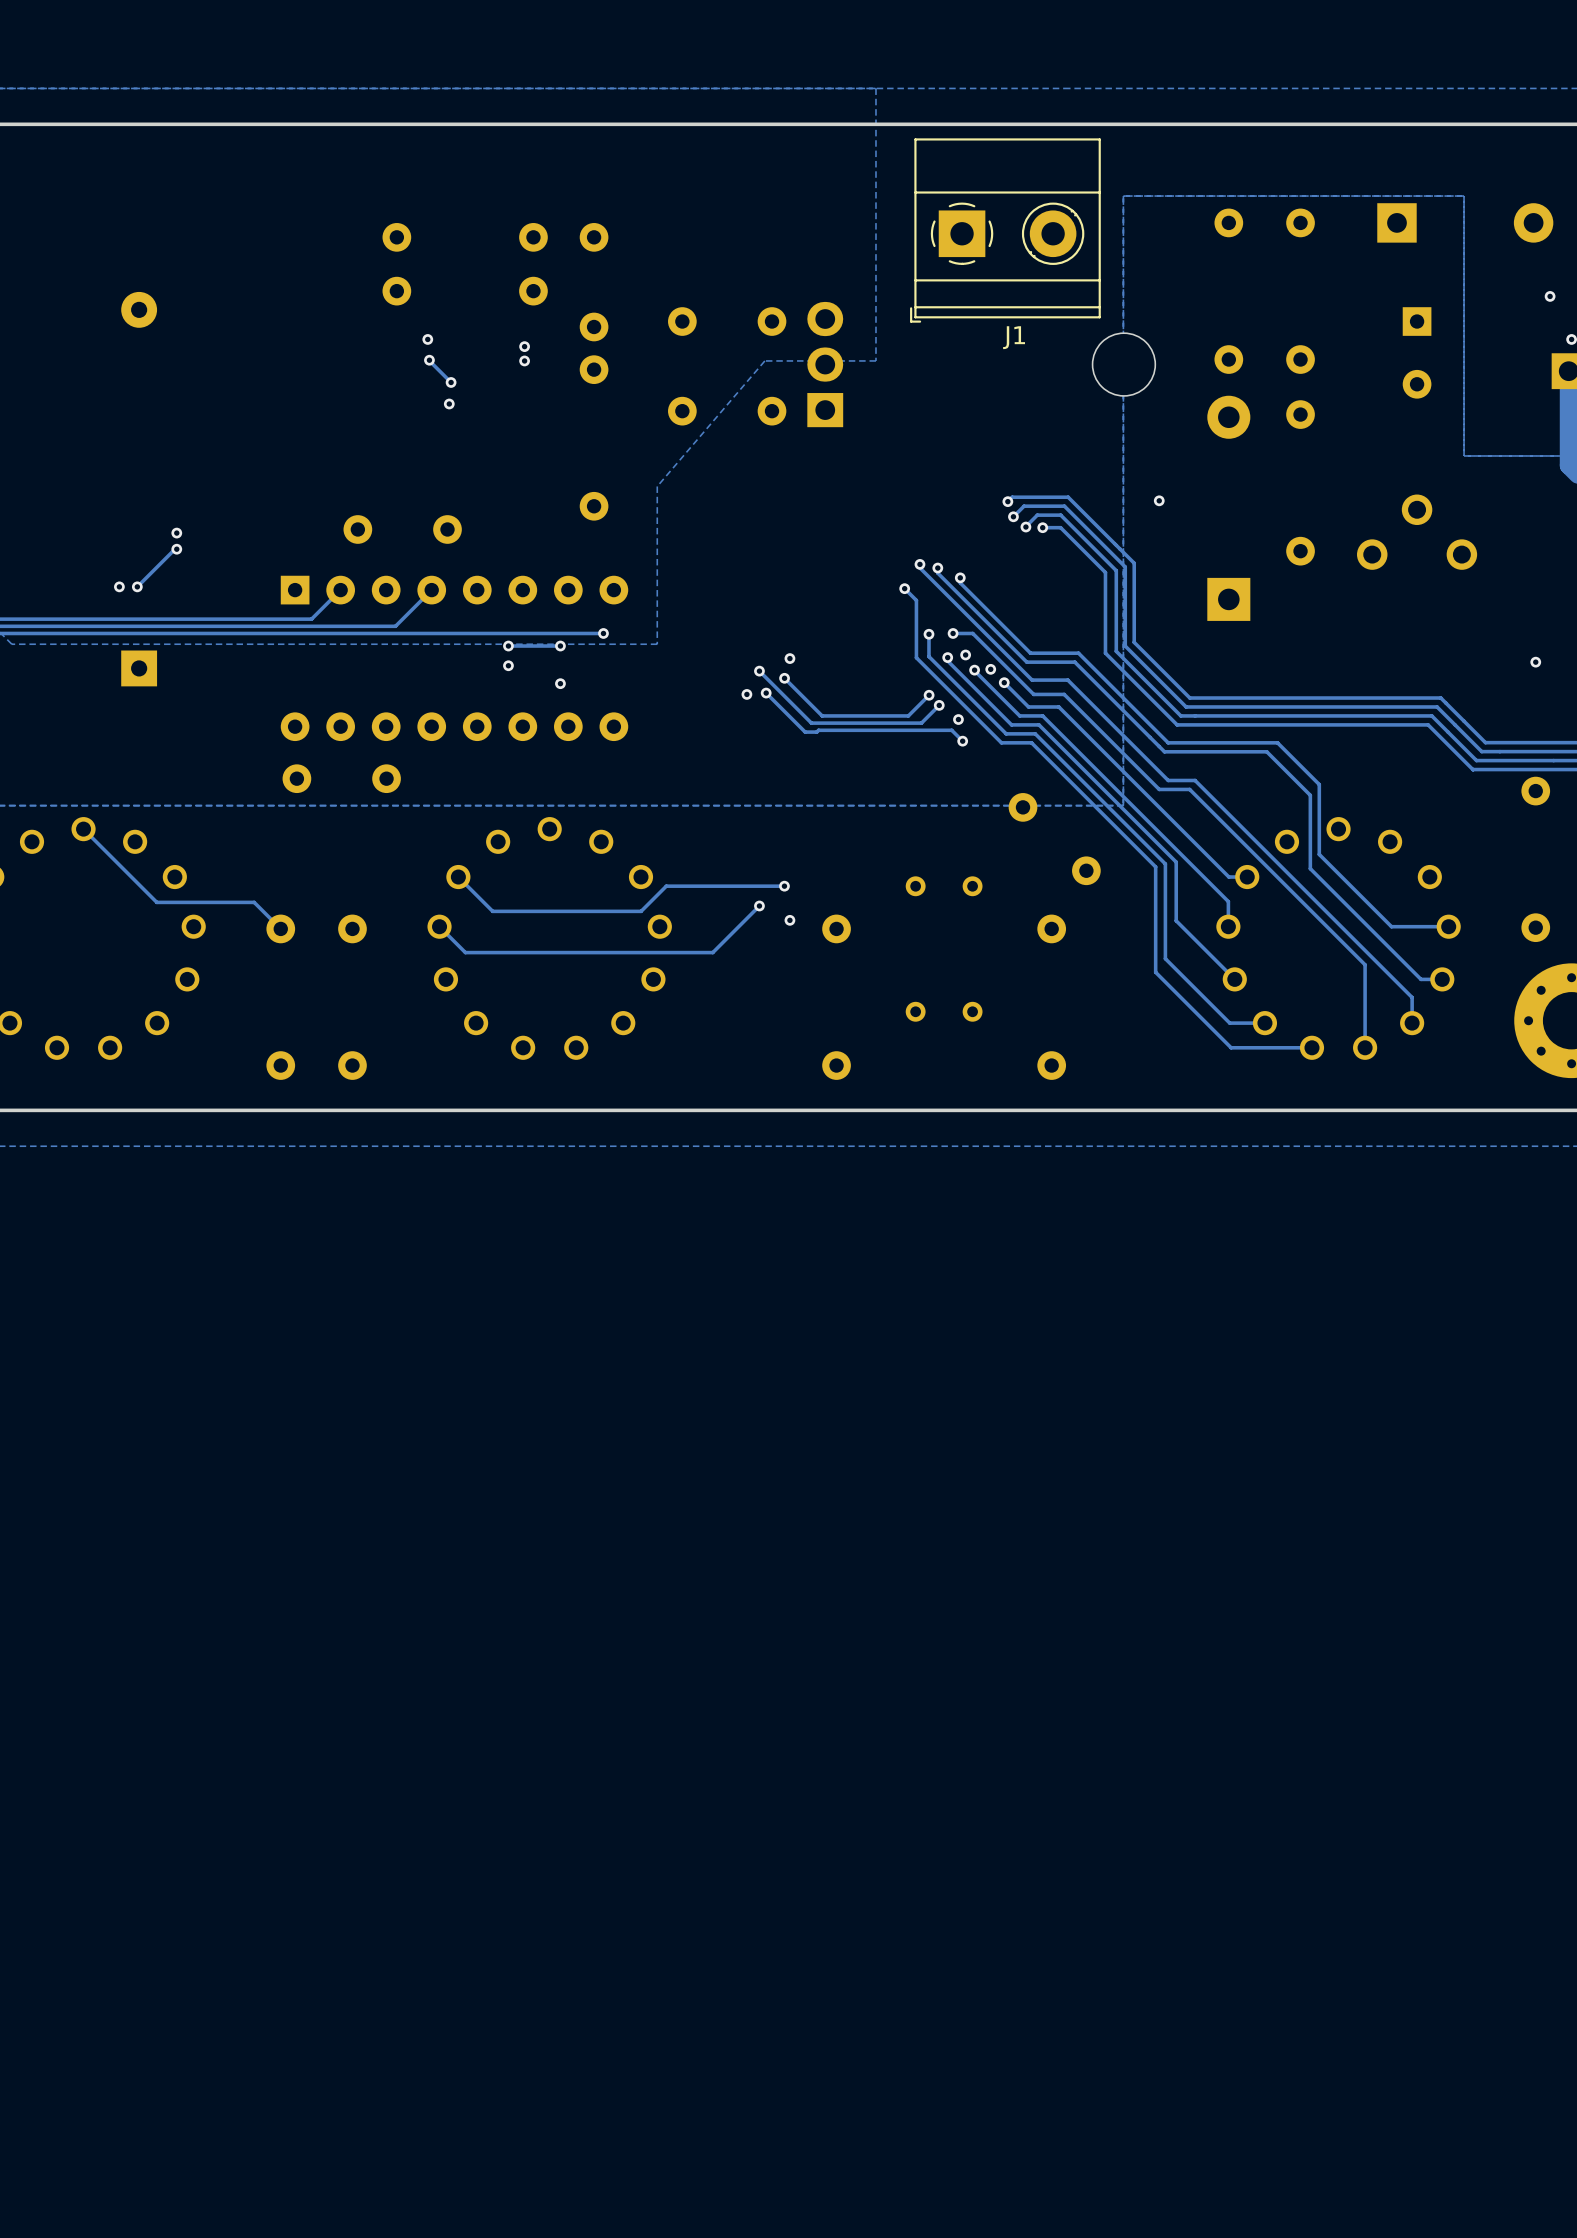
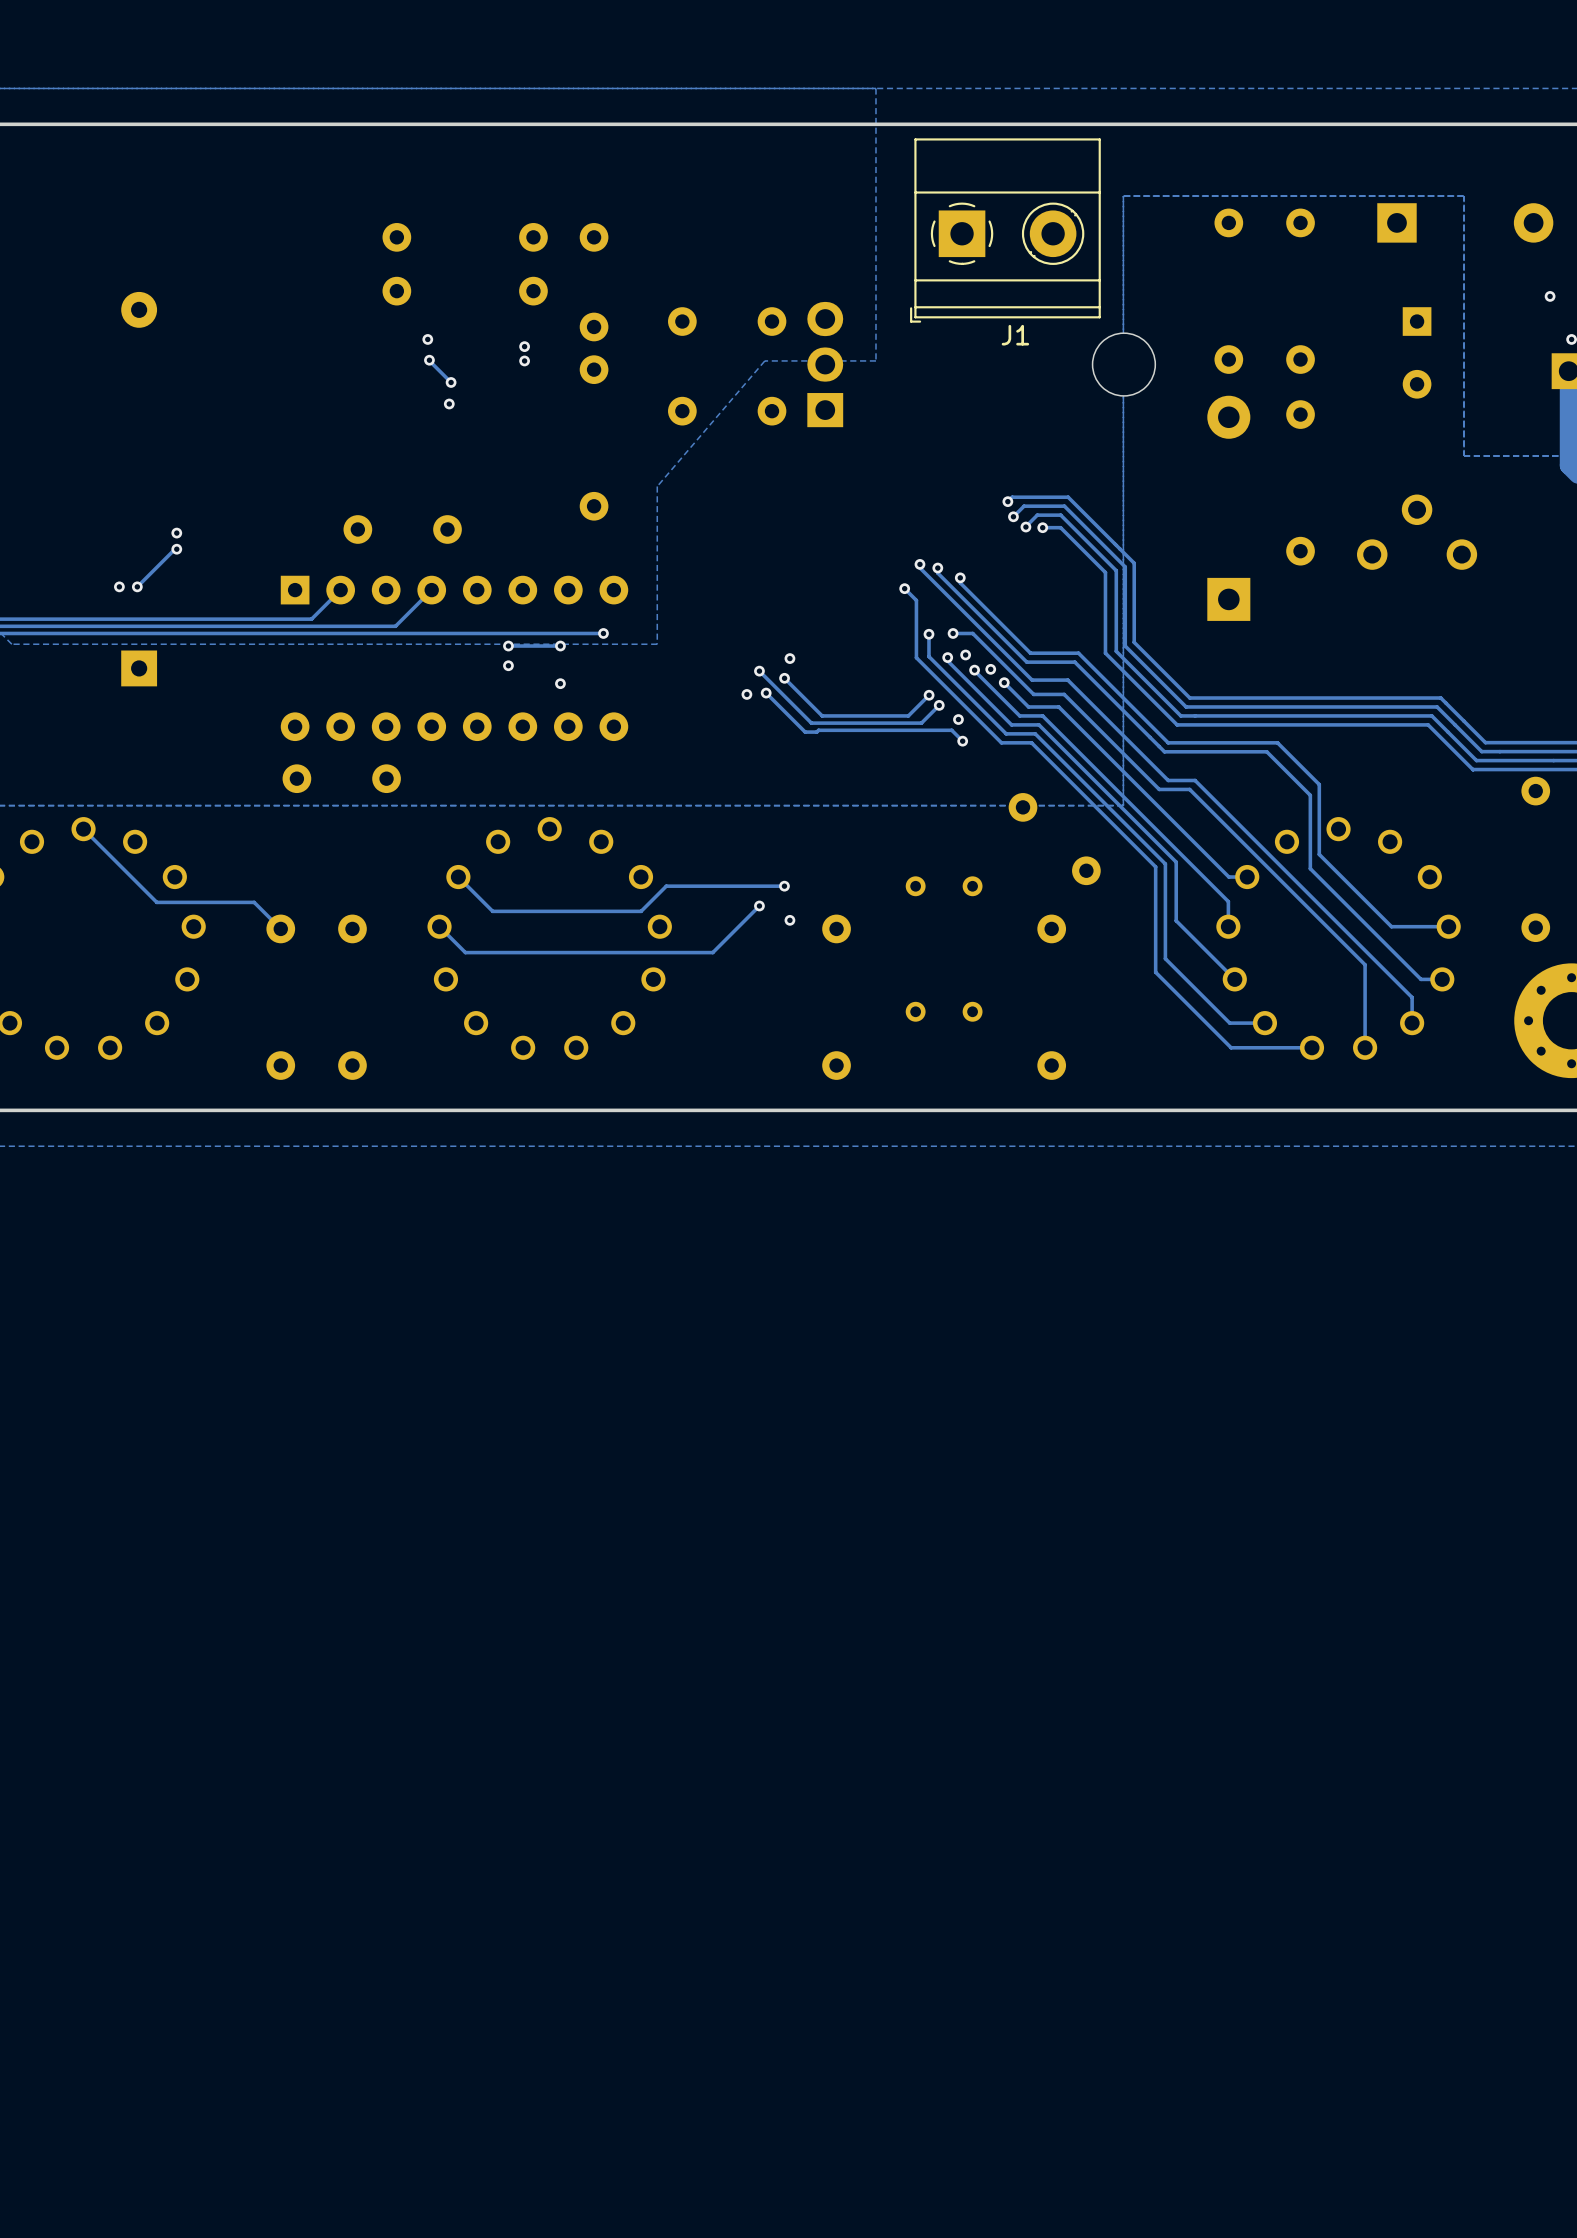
via: (1159, 500) -> none
via: (1535, 662) -> none

